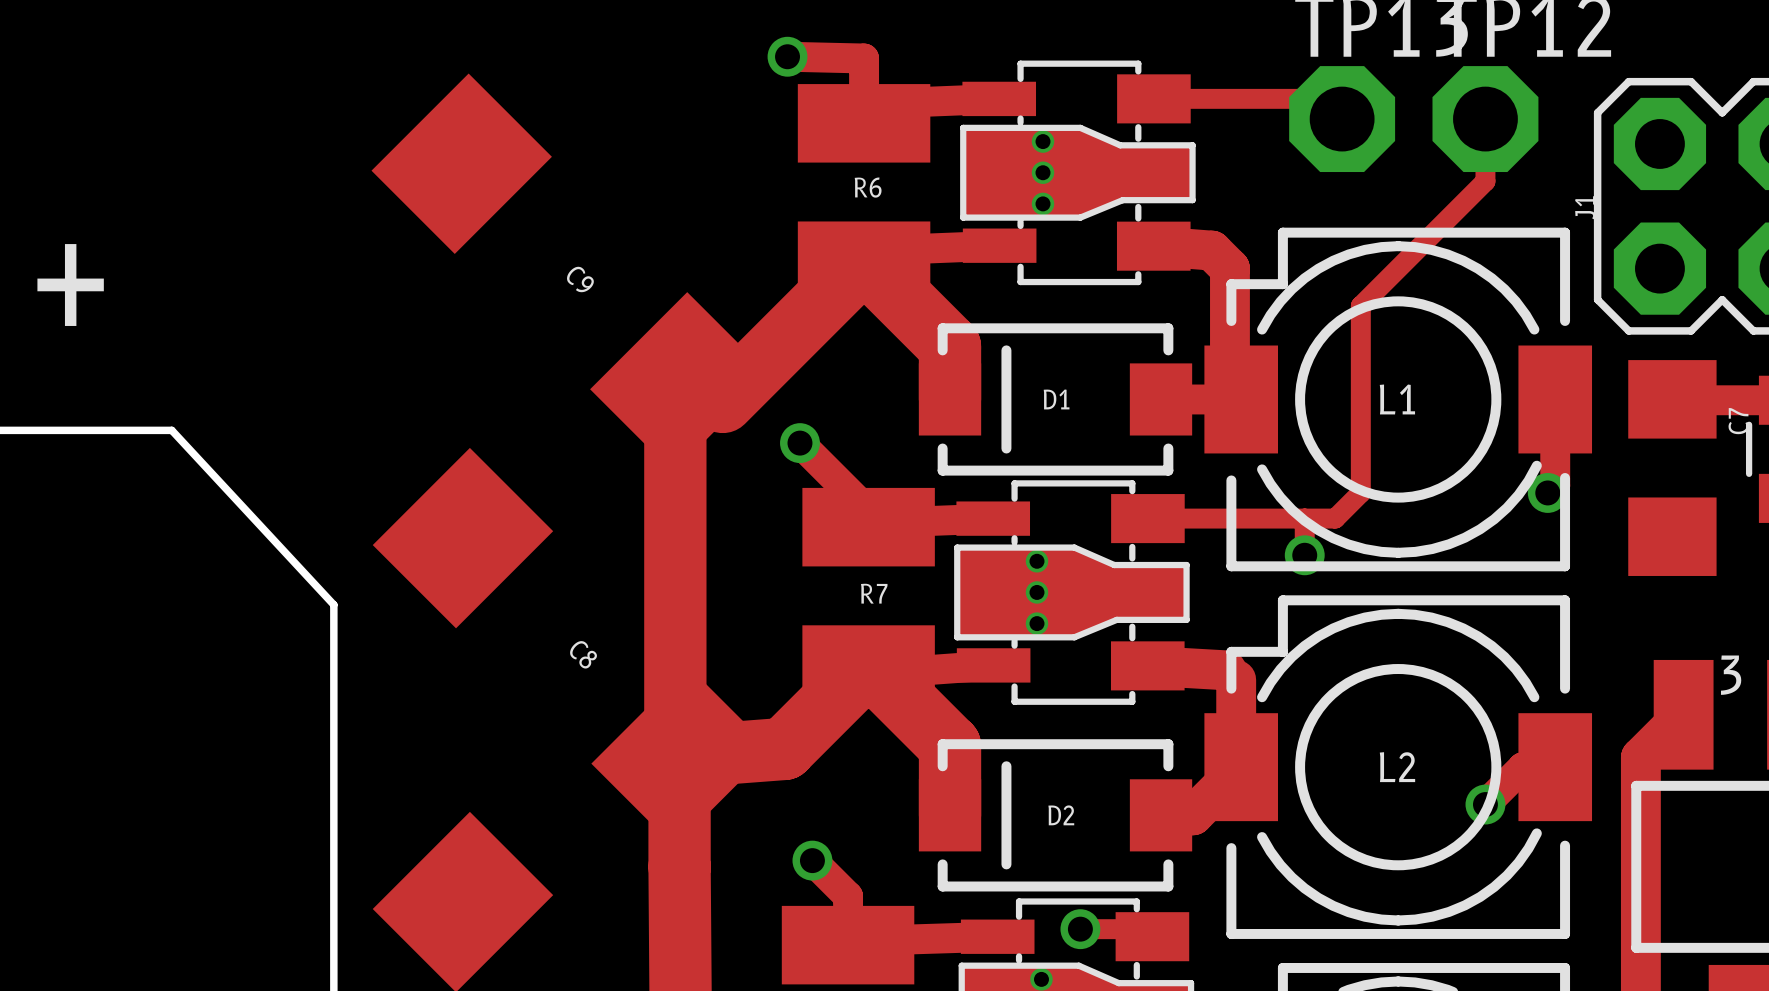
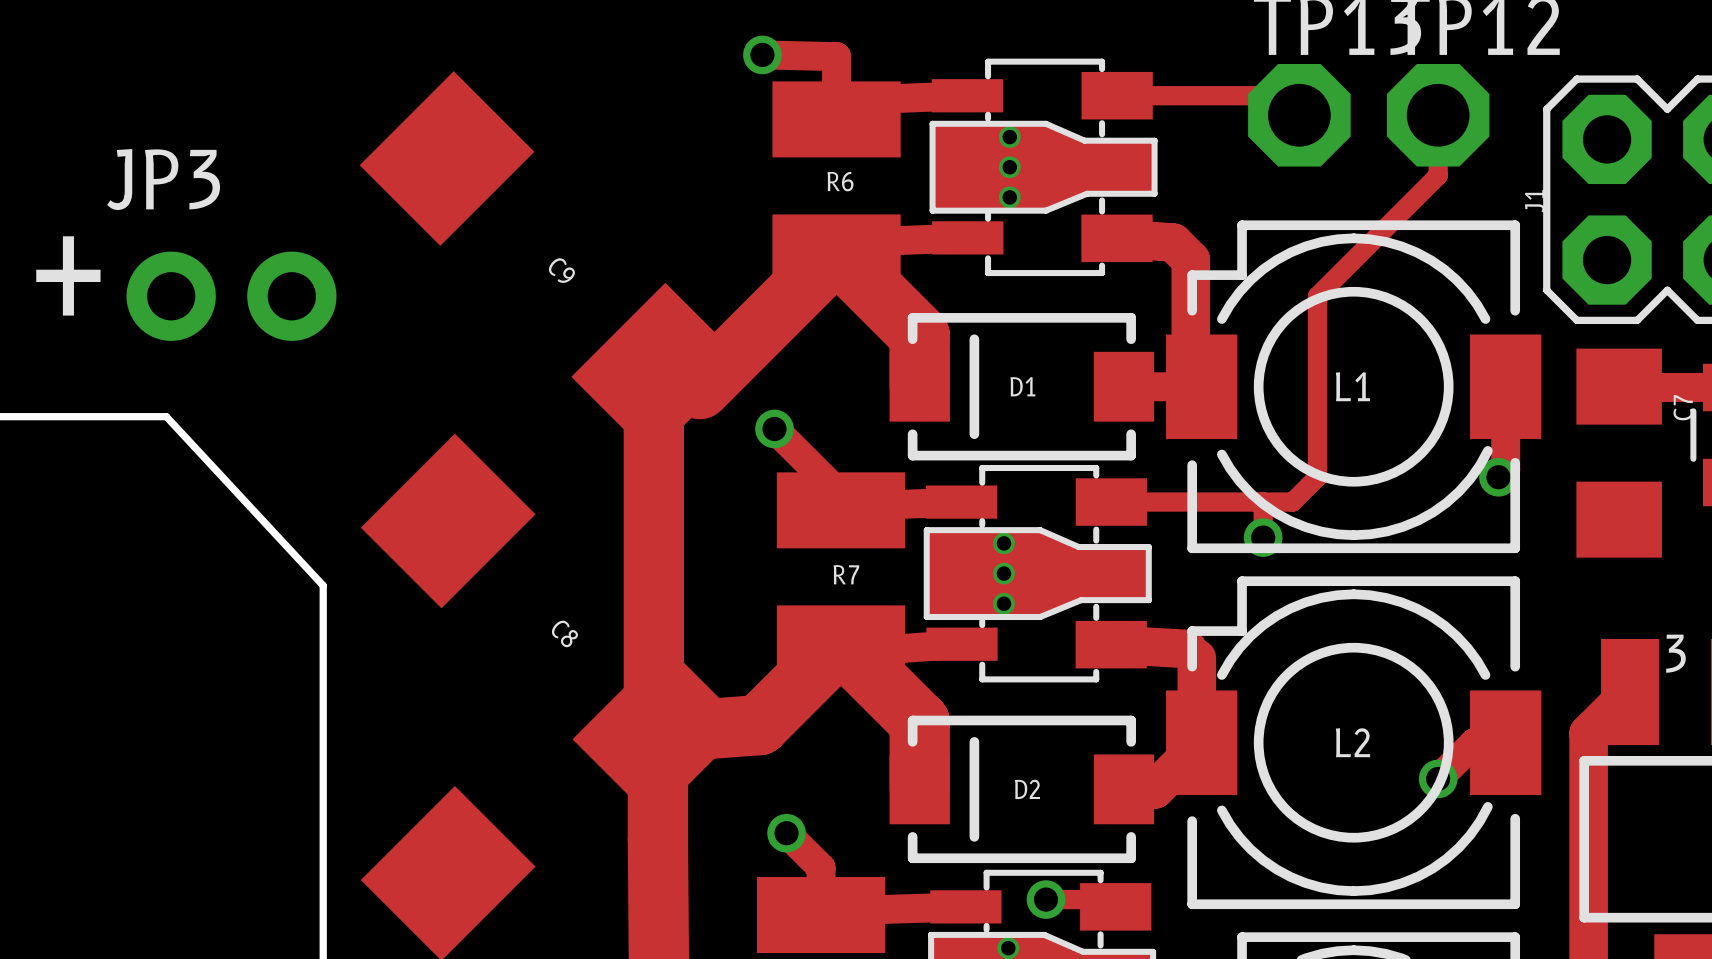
JP3: none -> (231, 296)

